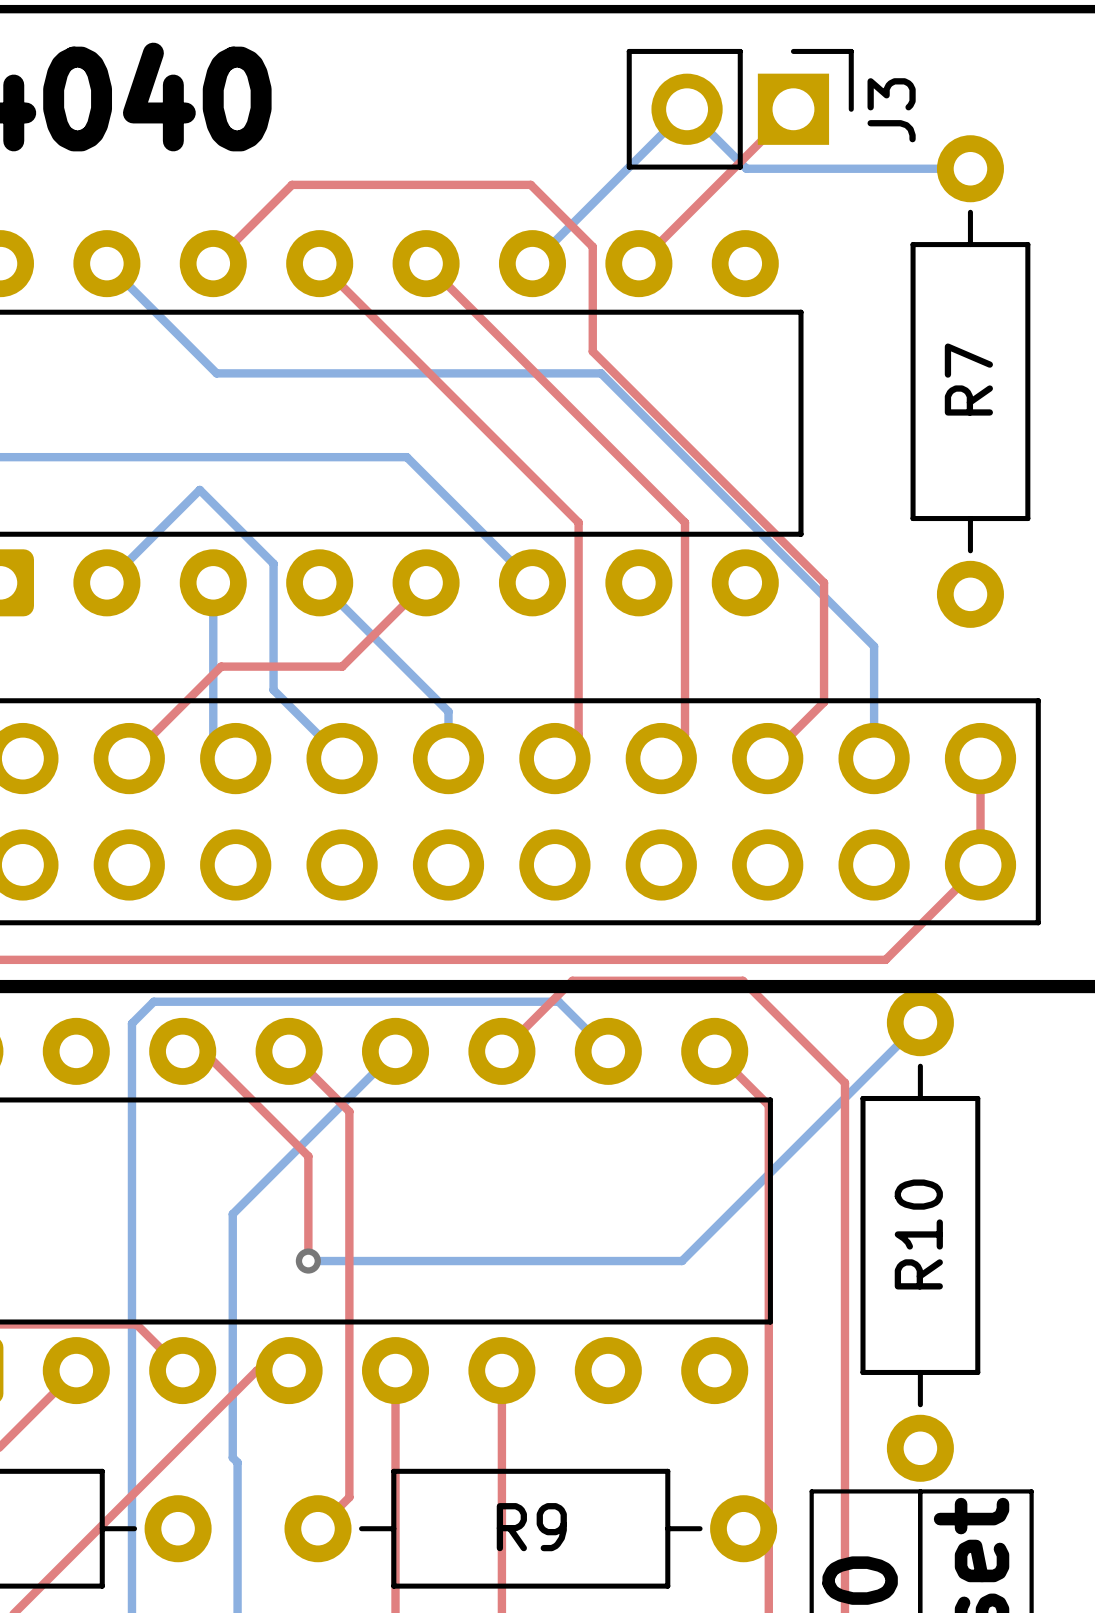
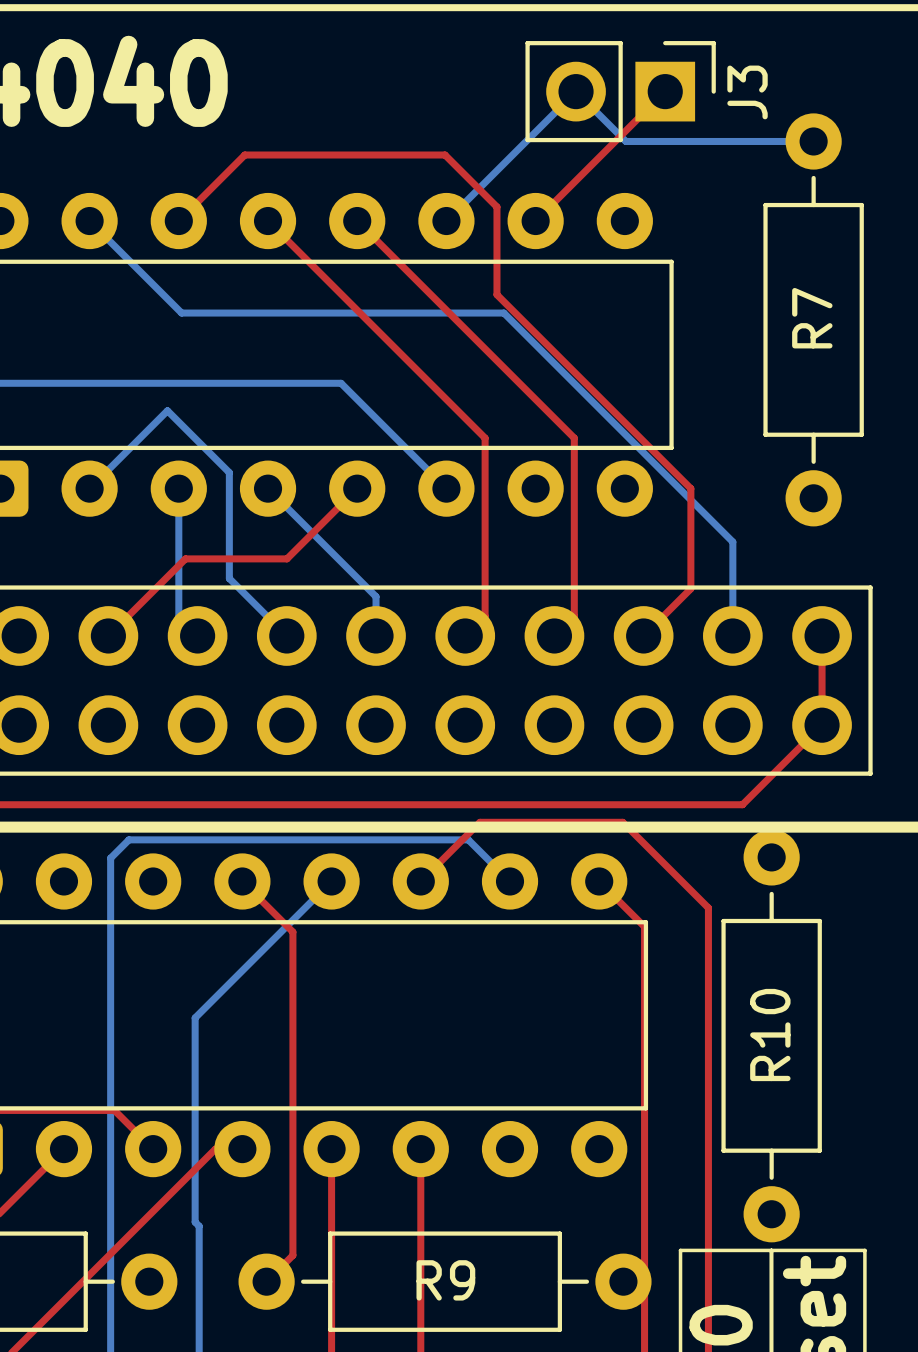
bottom track: (920, 1022) (682, 1261) (308, 1261) -> none
top track: (182, 1051) (203, 1051) (308, 1156) (308, 1261) -> none
via: (308, 1261) -> none

